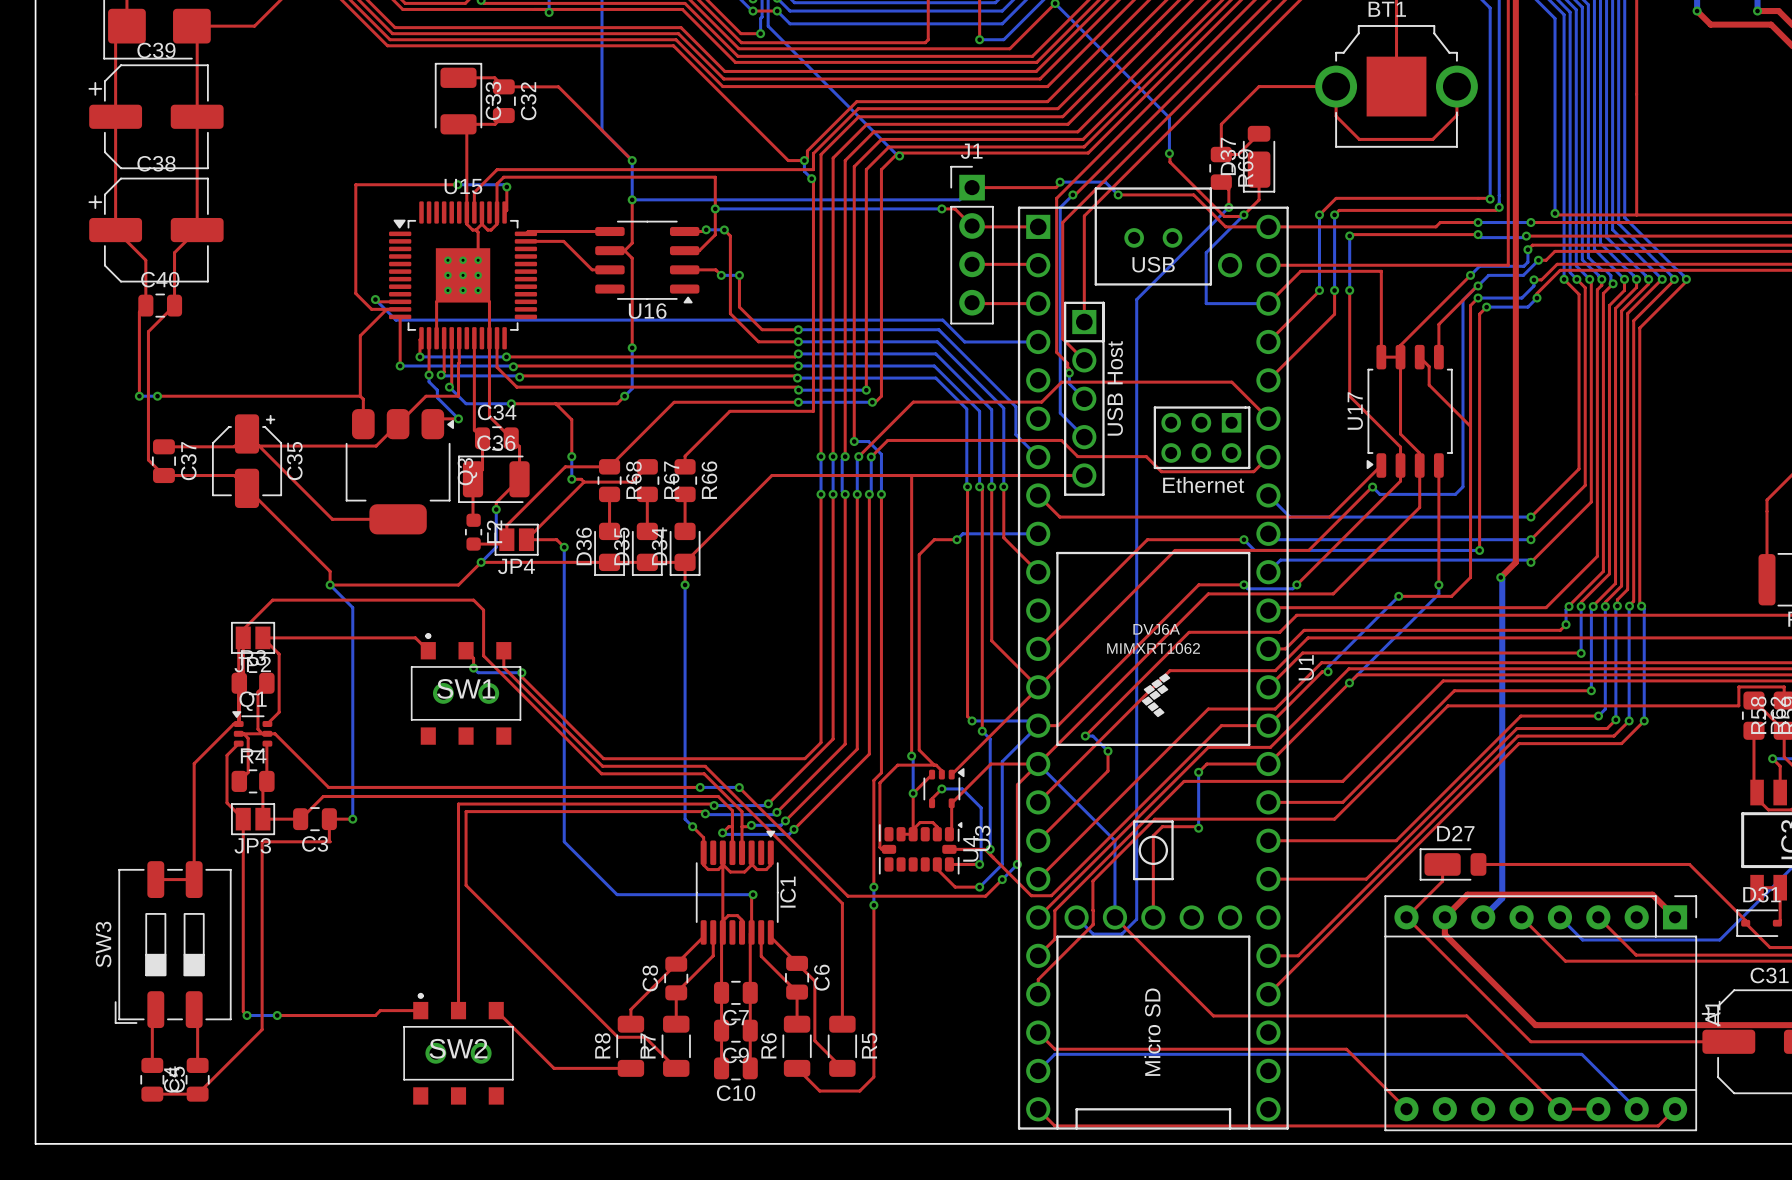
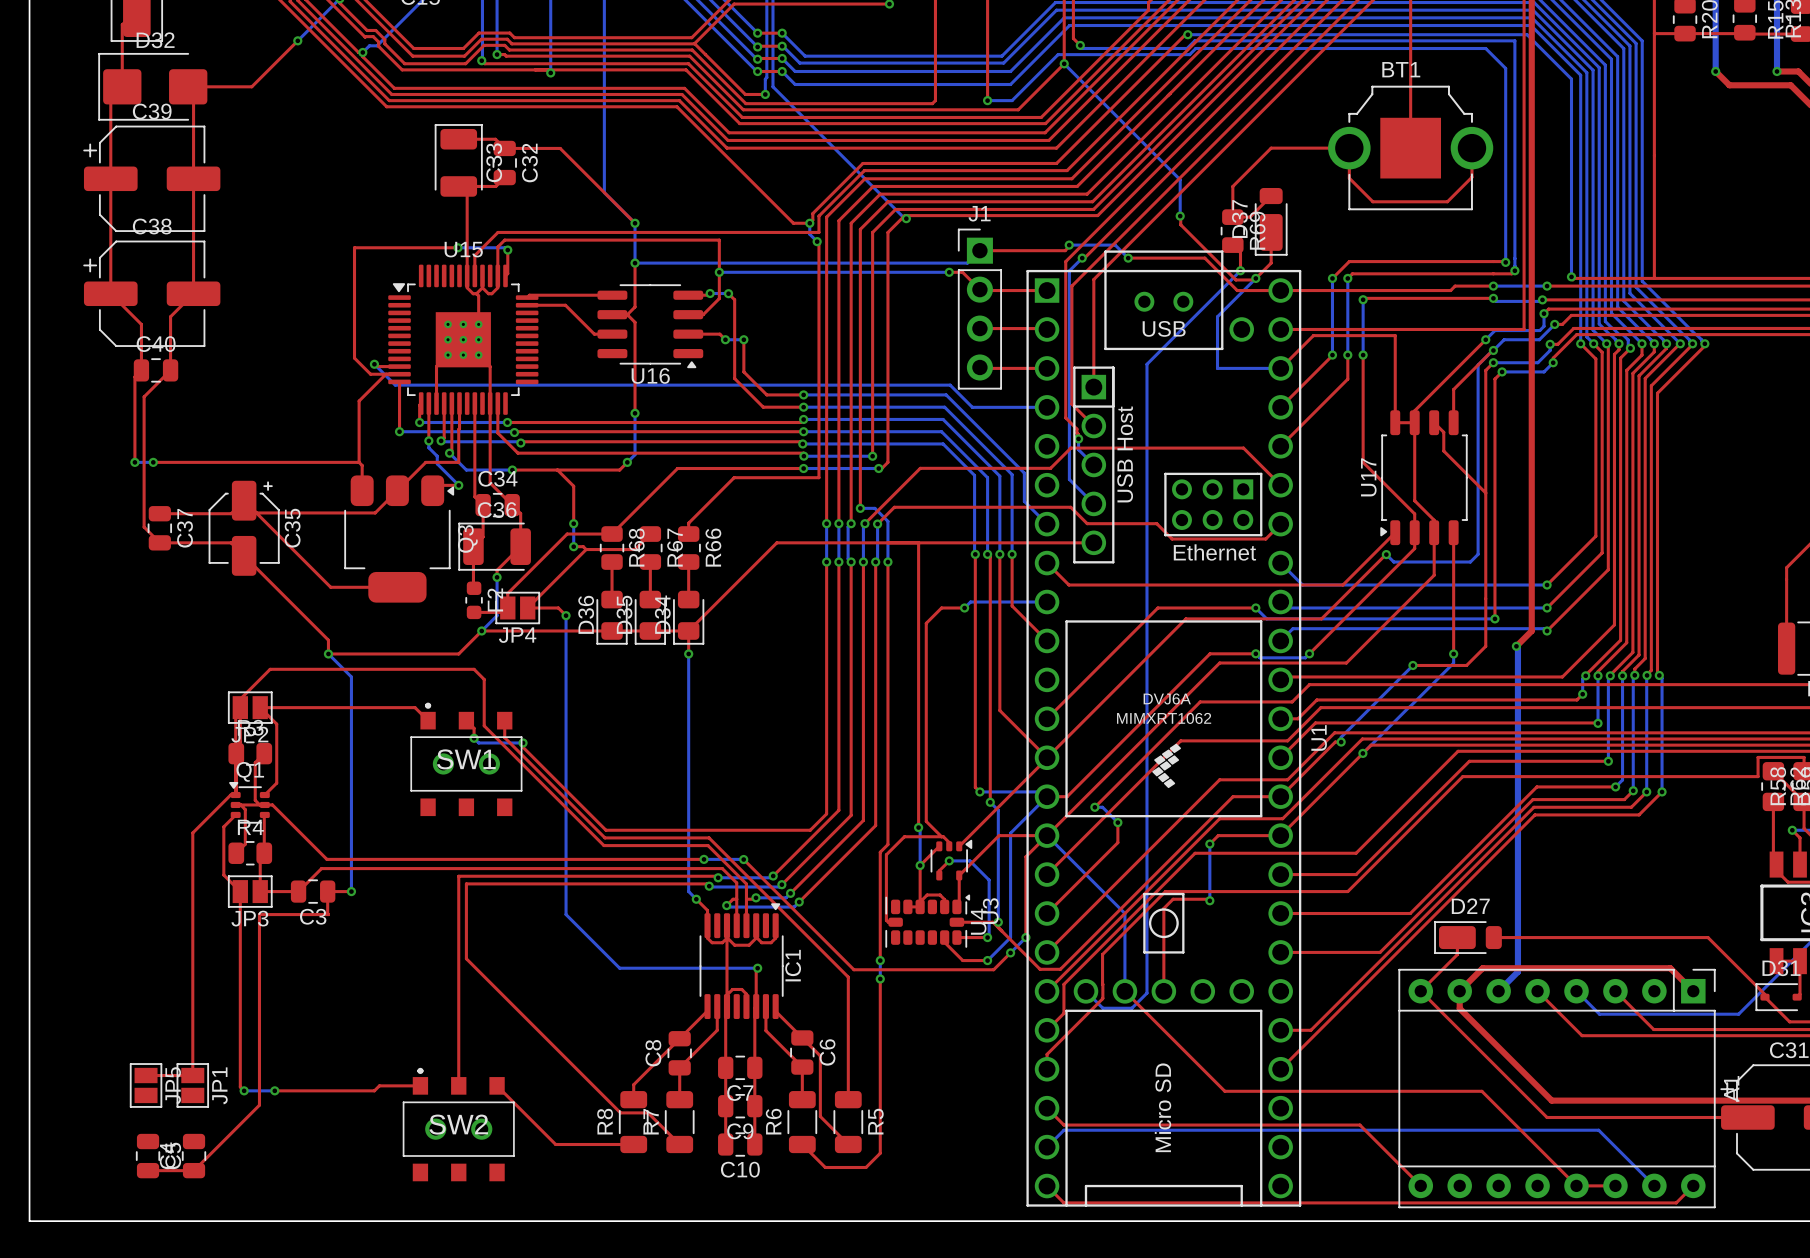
top track: (196, 761) (194, 763) (194, 879) (155, 879) -> (192, 832) (192, 1075) (146, 1075)
SW3: (173, 944) -> none
top track: (155, 1009) (152, 1013) (152, 1065) -> none
top track: (194, 1009) (197, 1013) (197, 1065) -> none
JP5: none -> (146, 1085)
JP1: none -> (192, 1085)

